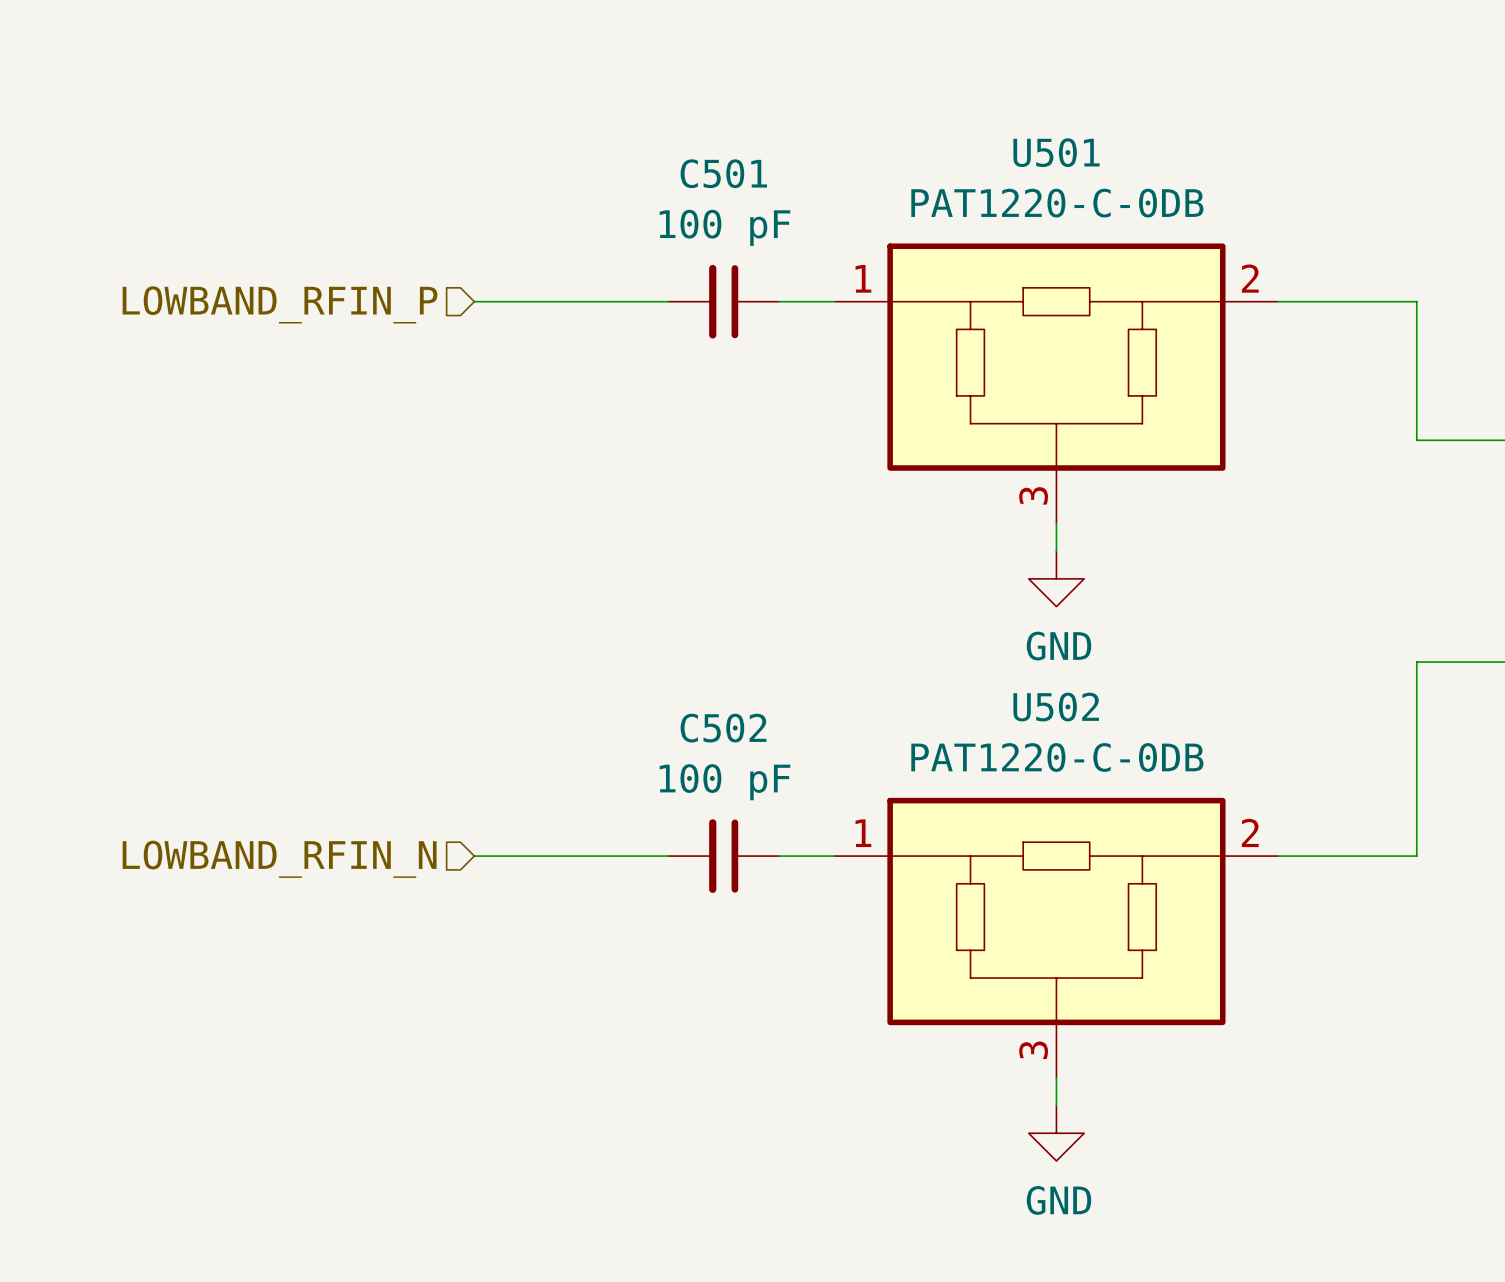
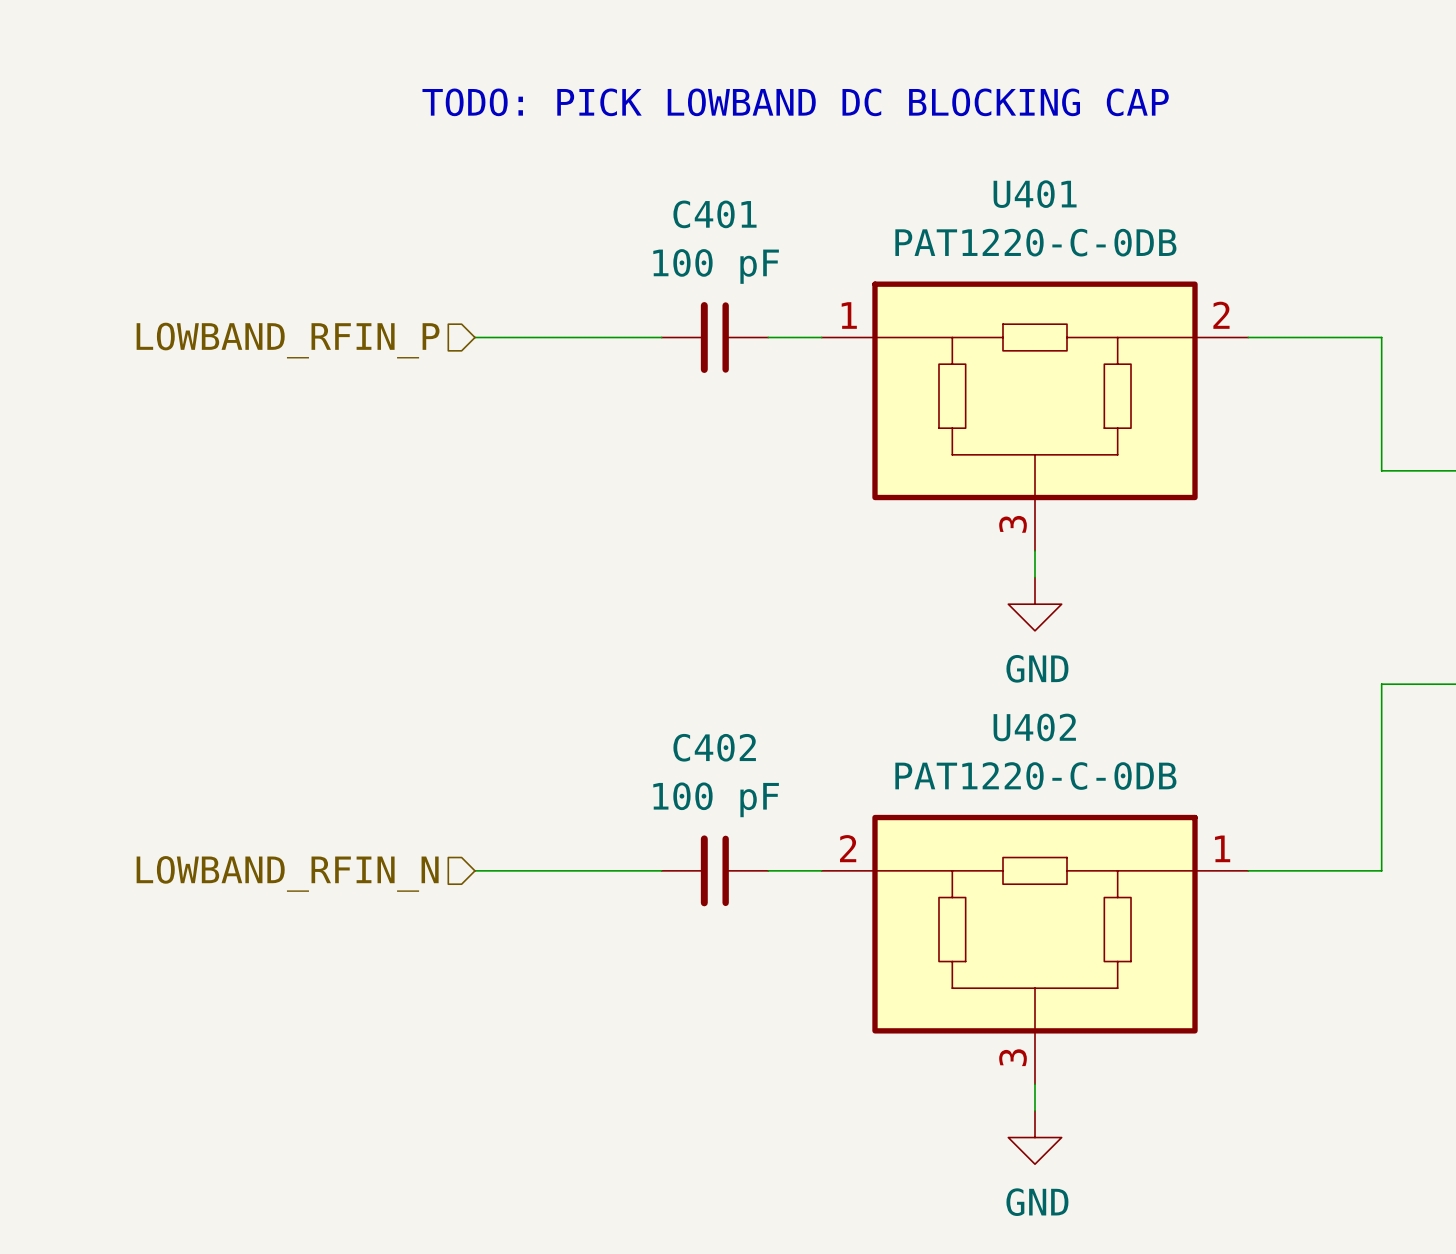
text: none -> TODO: PICK LOWBAND DC BLOCKING CAP (795, 102)
U501 name: U501 (1056, 152) -> U401 (1035, 194)
C501 name: C501 (723, 173) -> C401 (714, 214)
U502 name: U502 (1056, 707) -> U402 (1034, 727)
C502 name: C502 (723, 728) -> C402 (714, 747)
U502 flip: as is (1056, 911) -> left-right (1034, 924)

